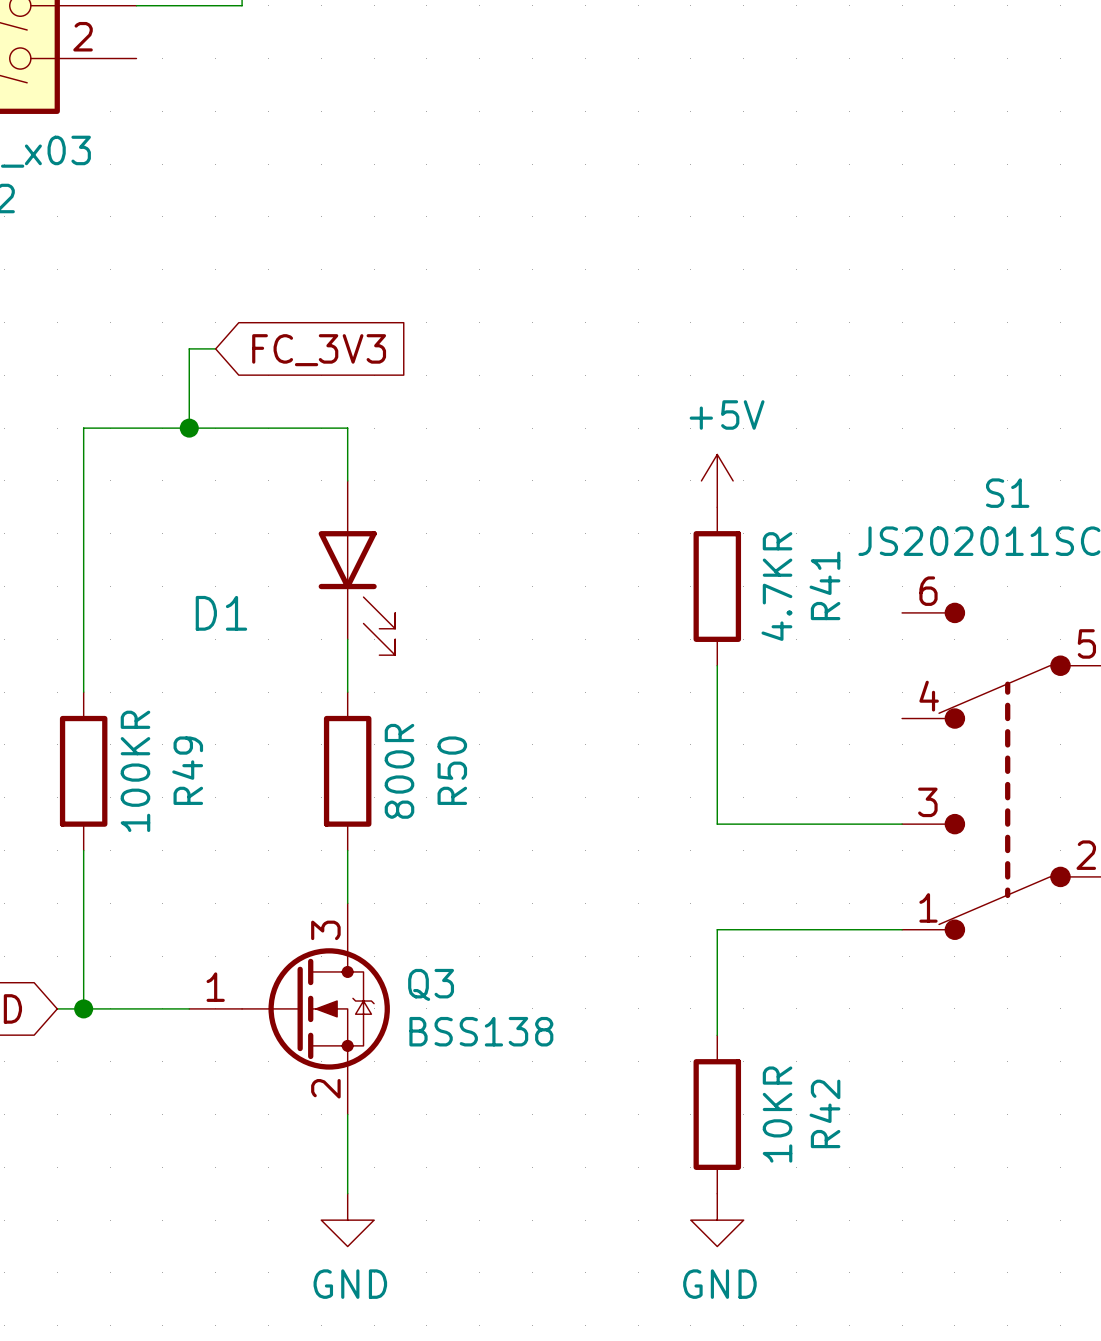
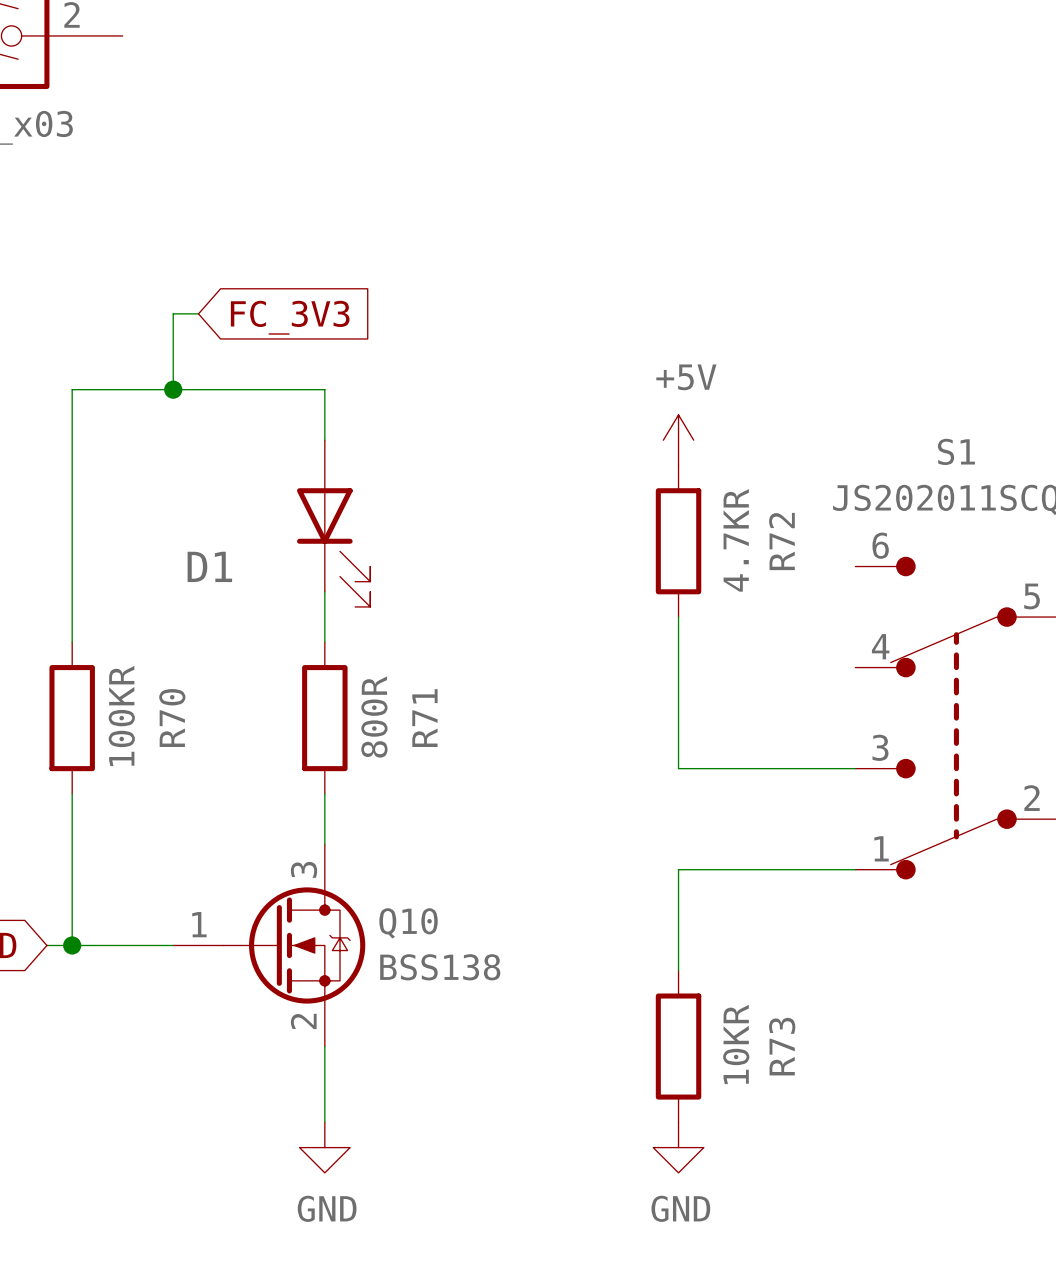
R41 name: R41 (824, 585) -> R72 (781, 541)
R49 name: R49 (187, 770) -> R70 (172, 718)
R50 name: R50 (452, 770) -> R71 (424, 718)
Q3 name: Q3 (431, 984) -> Q10 (408, 923)
R42 name: R42 (824, 1113) -> R73 (782, 1046)

